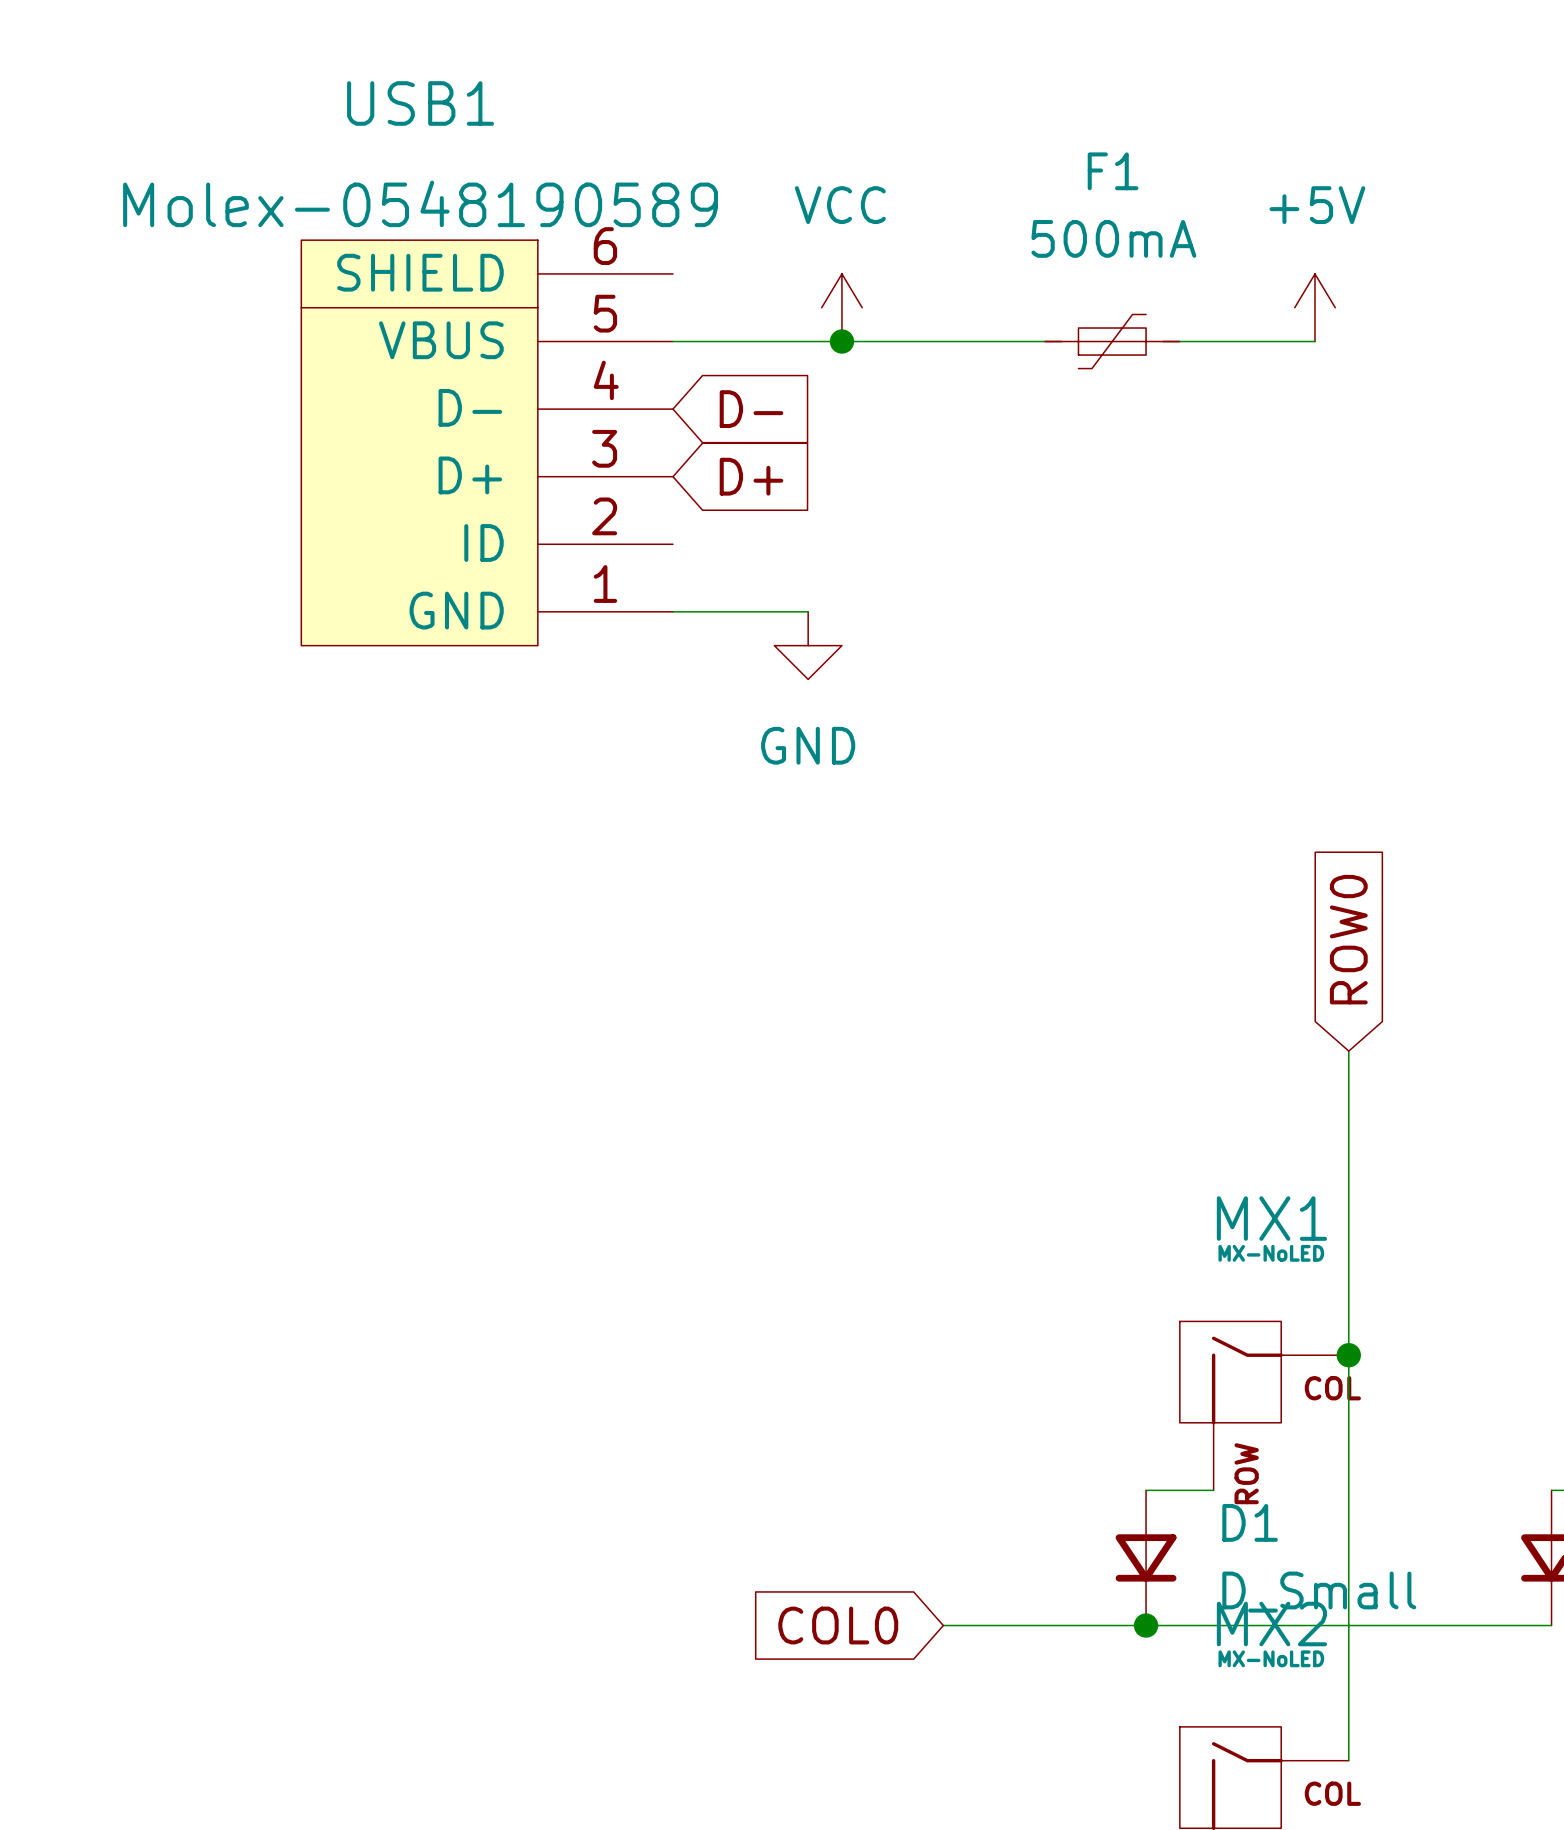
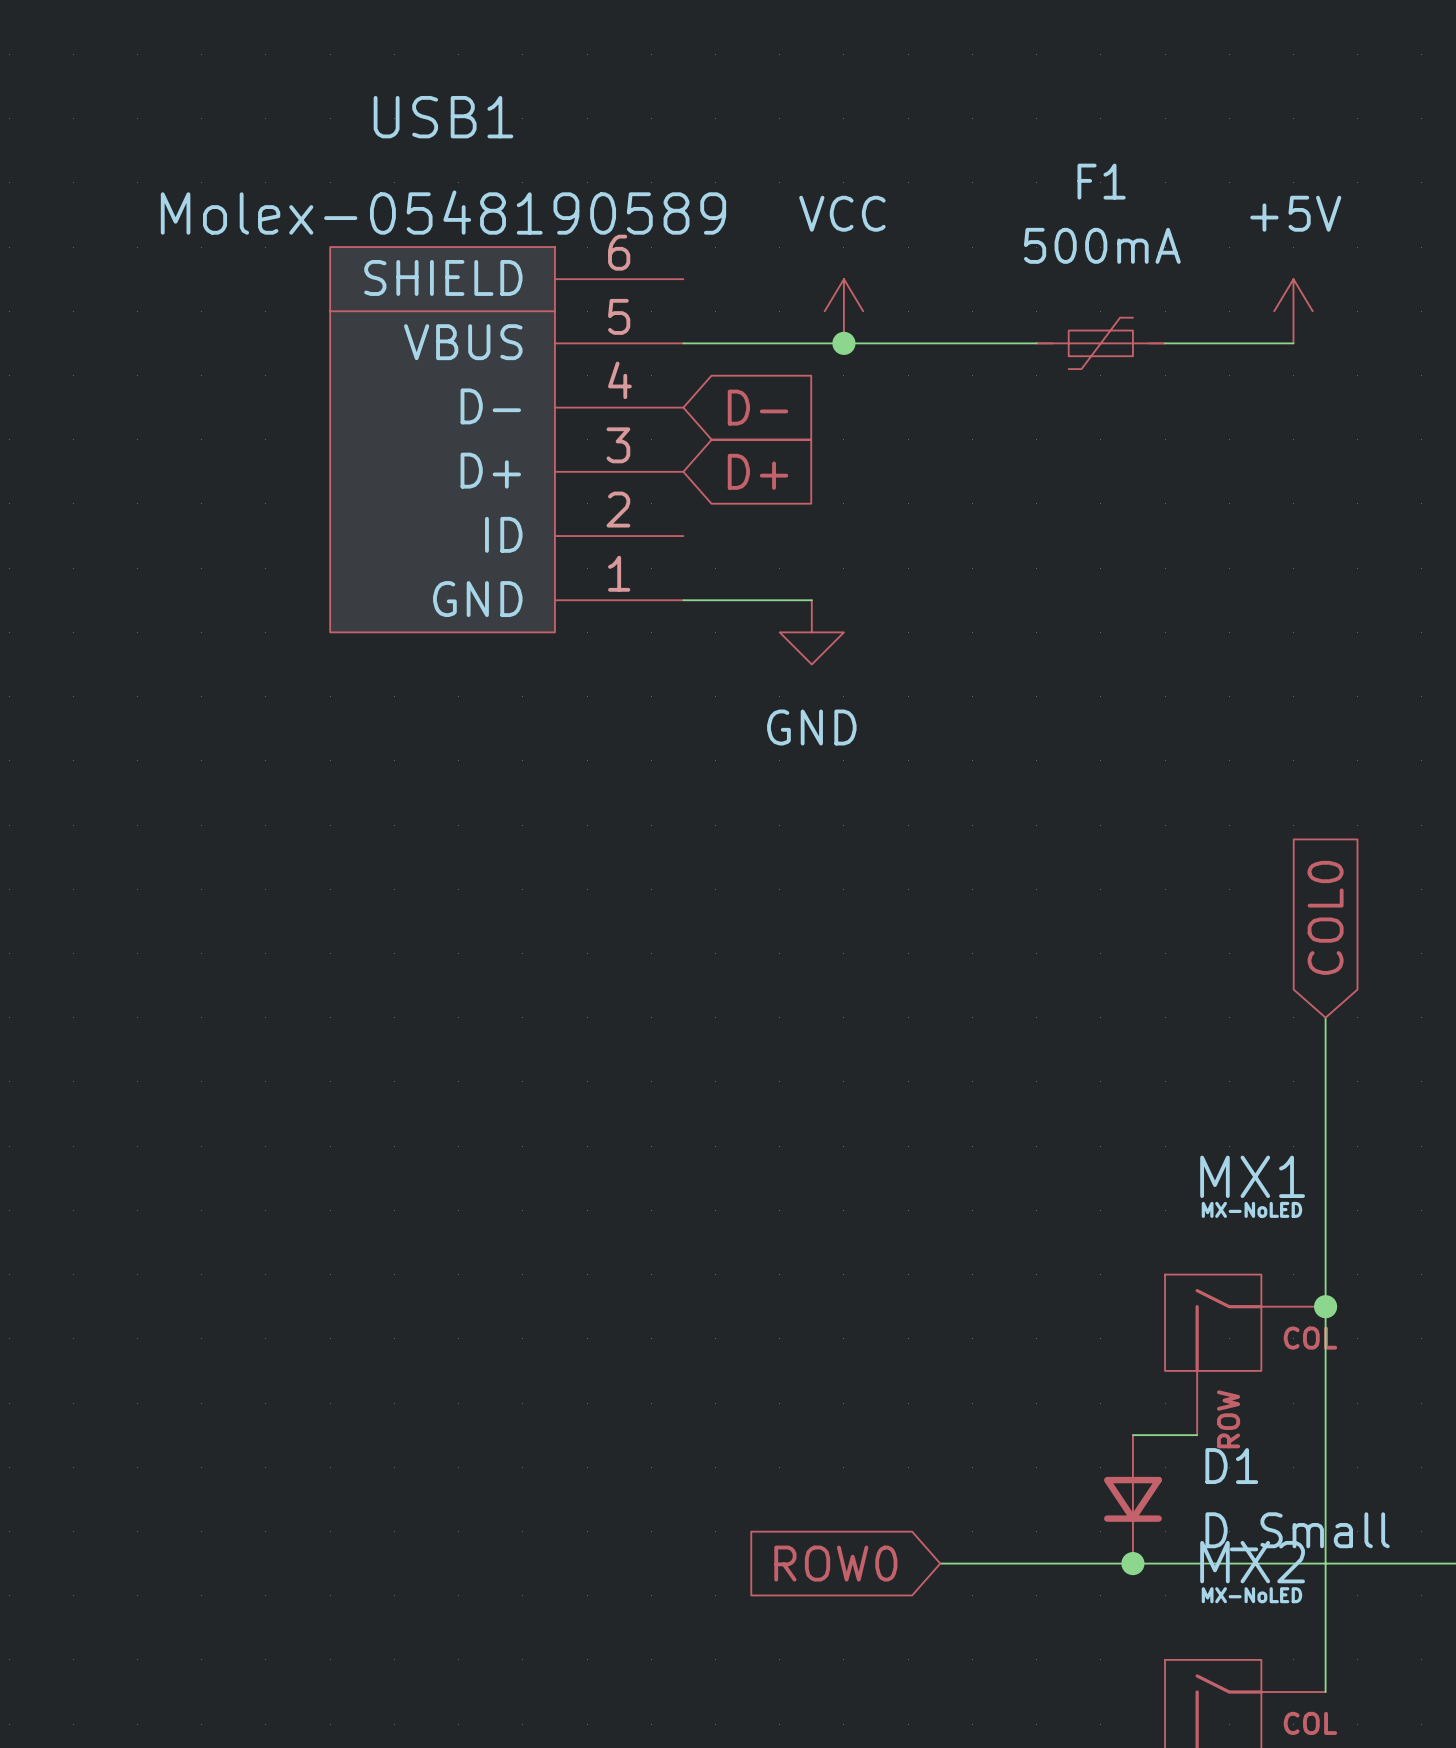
global label: ROW0 (1348, 939) -> COL0 (1325, 917)
global label: COL0 (838, 1625) -> ROW0 (835, 1563)

